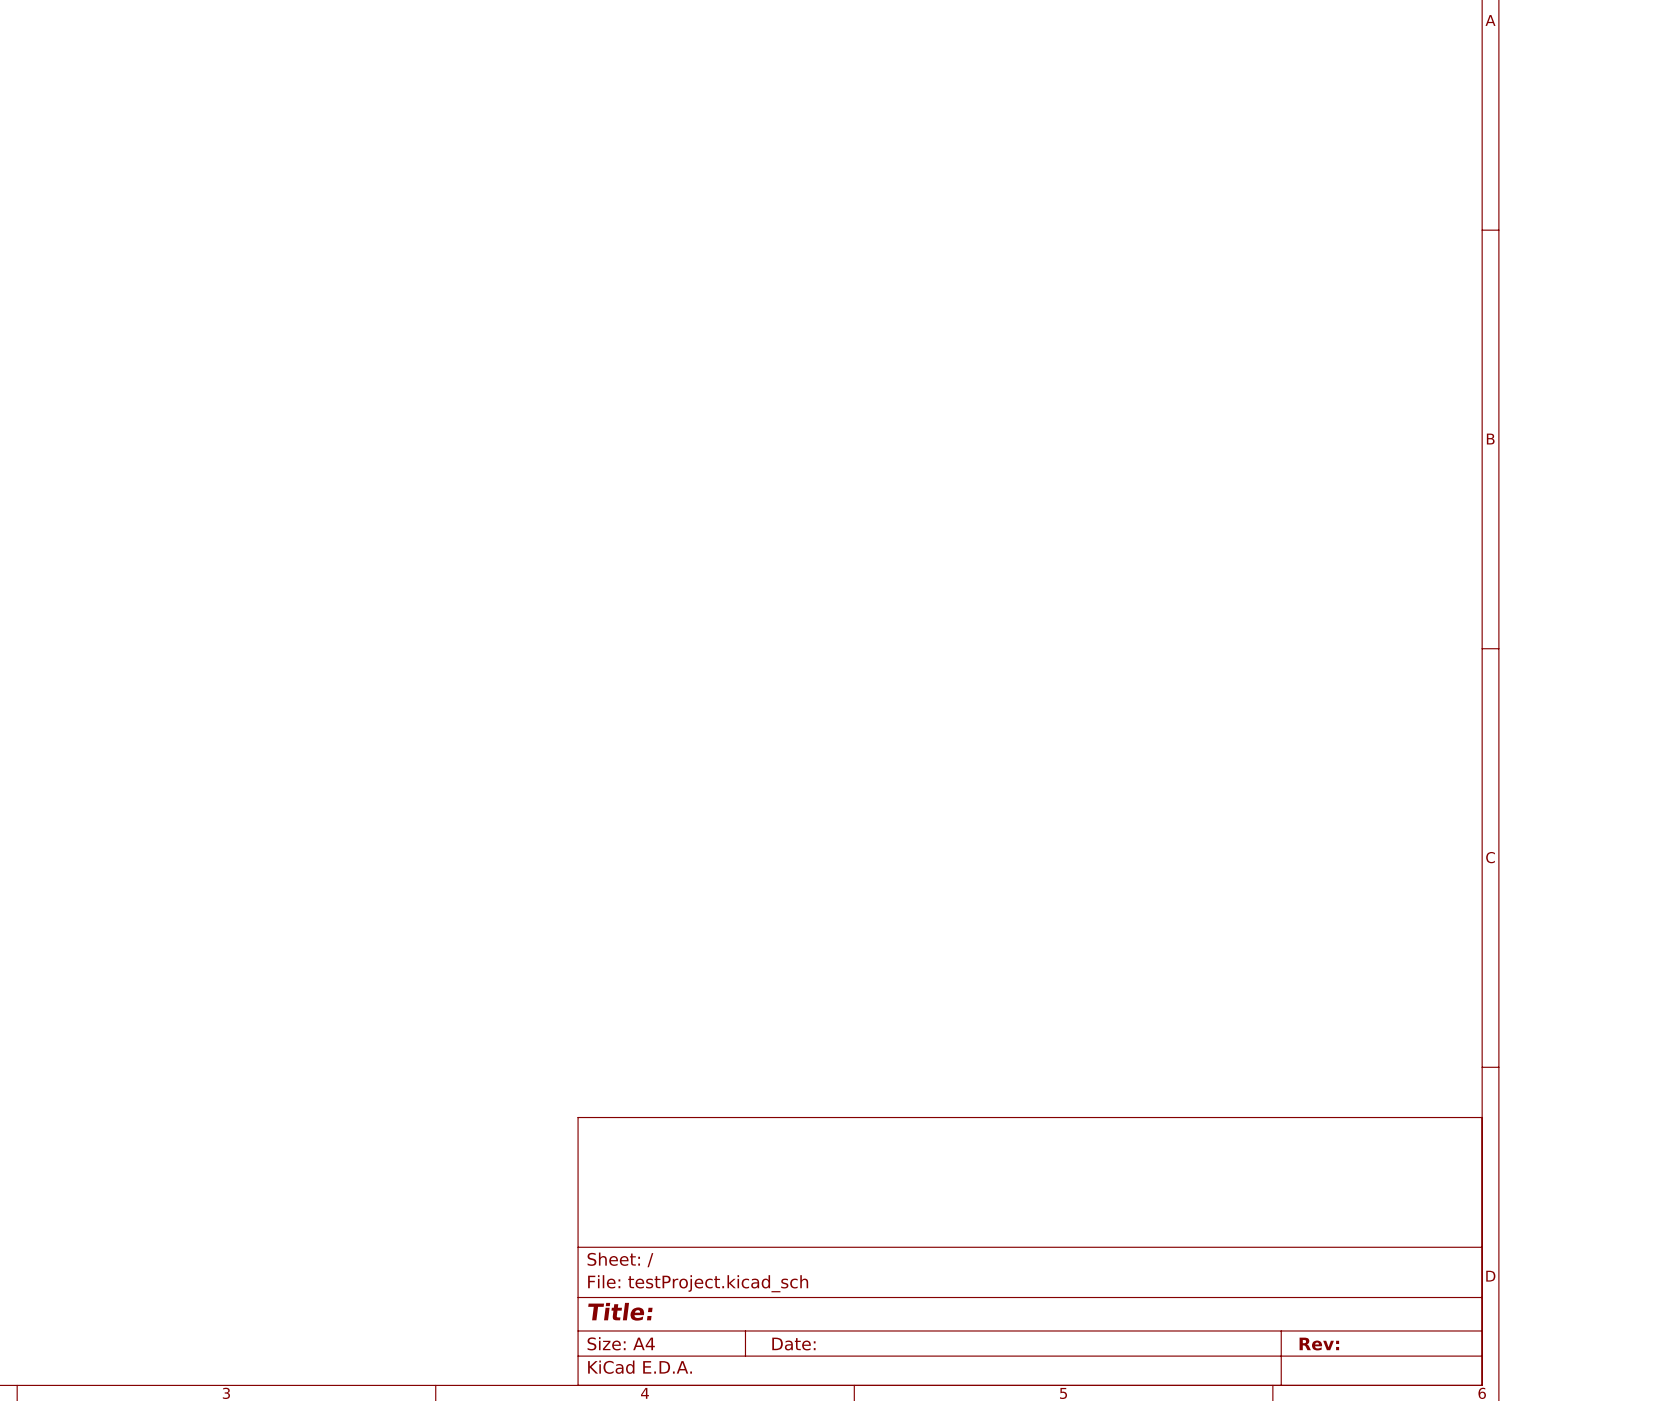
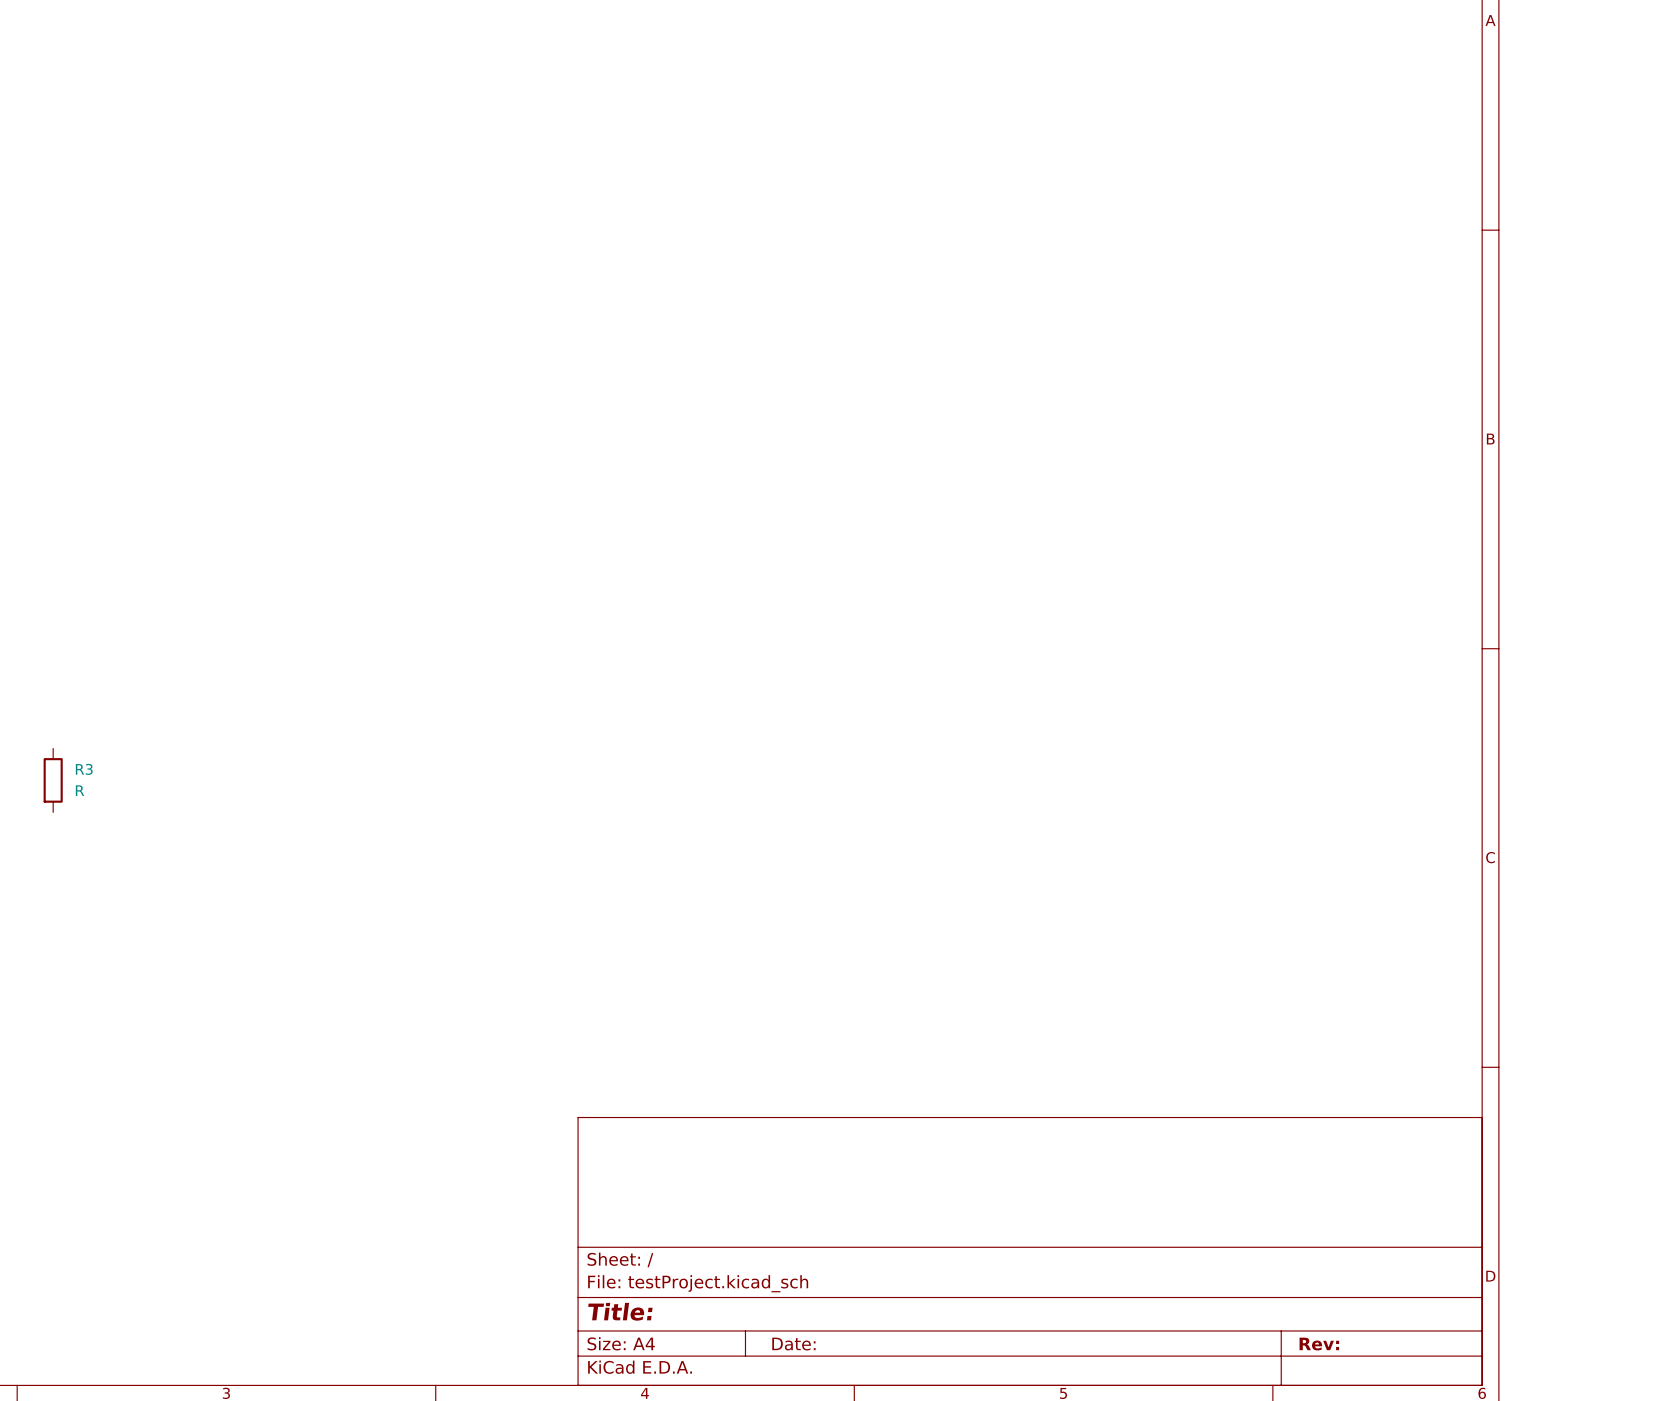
R3: none -> R (53, 780)

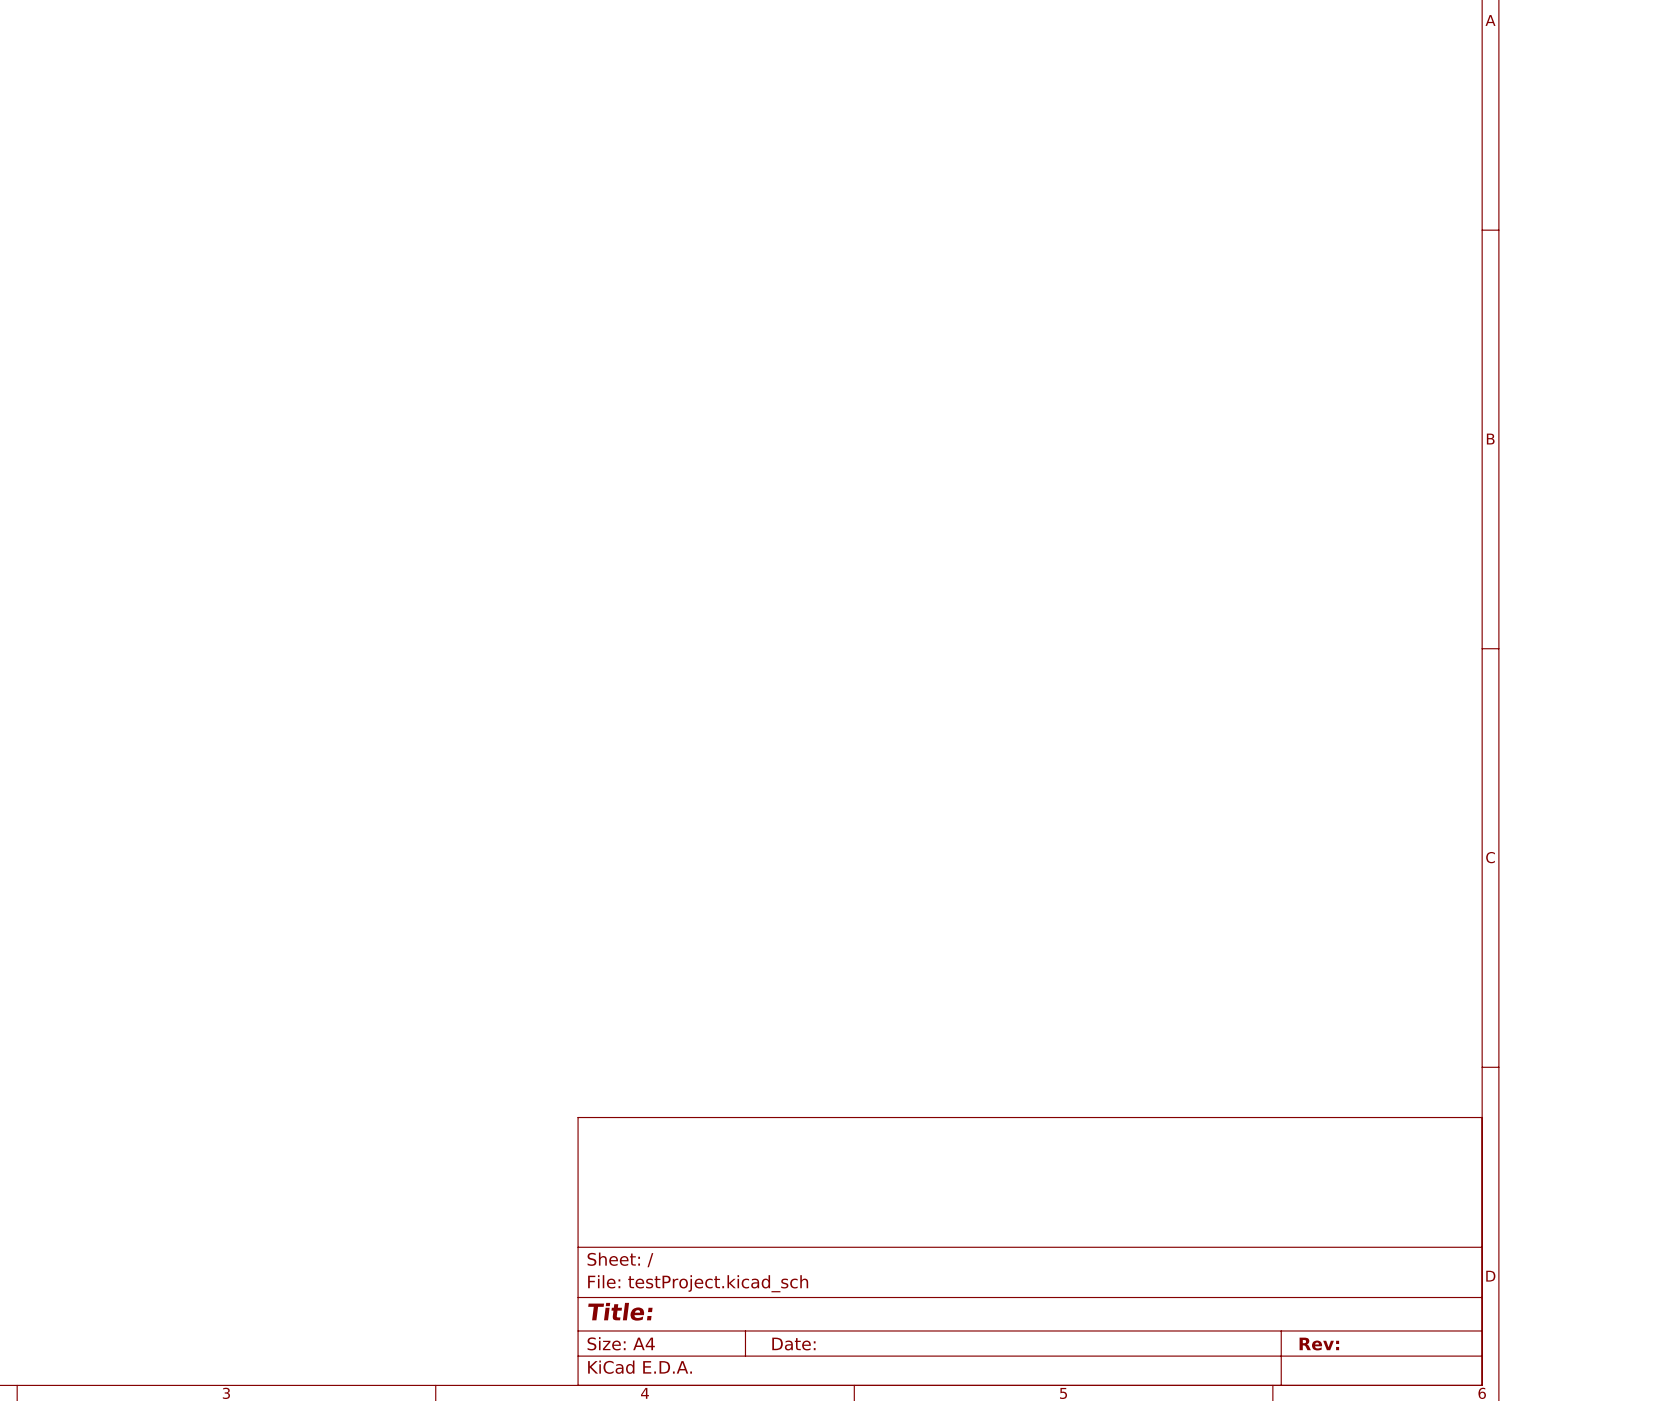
R3: R (53, 780) -> none

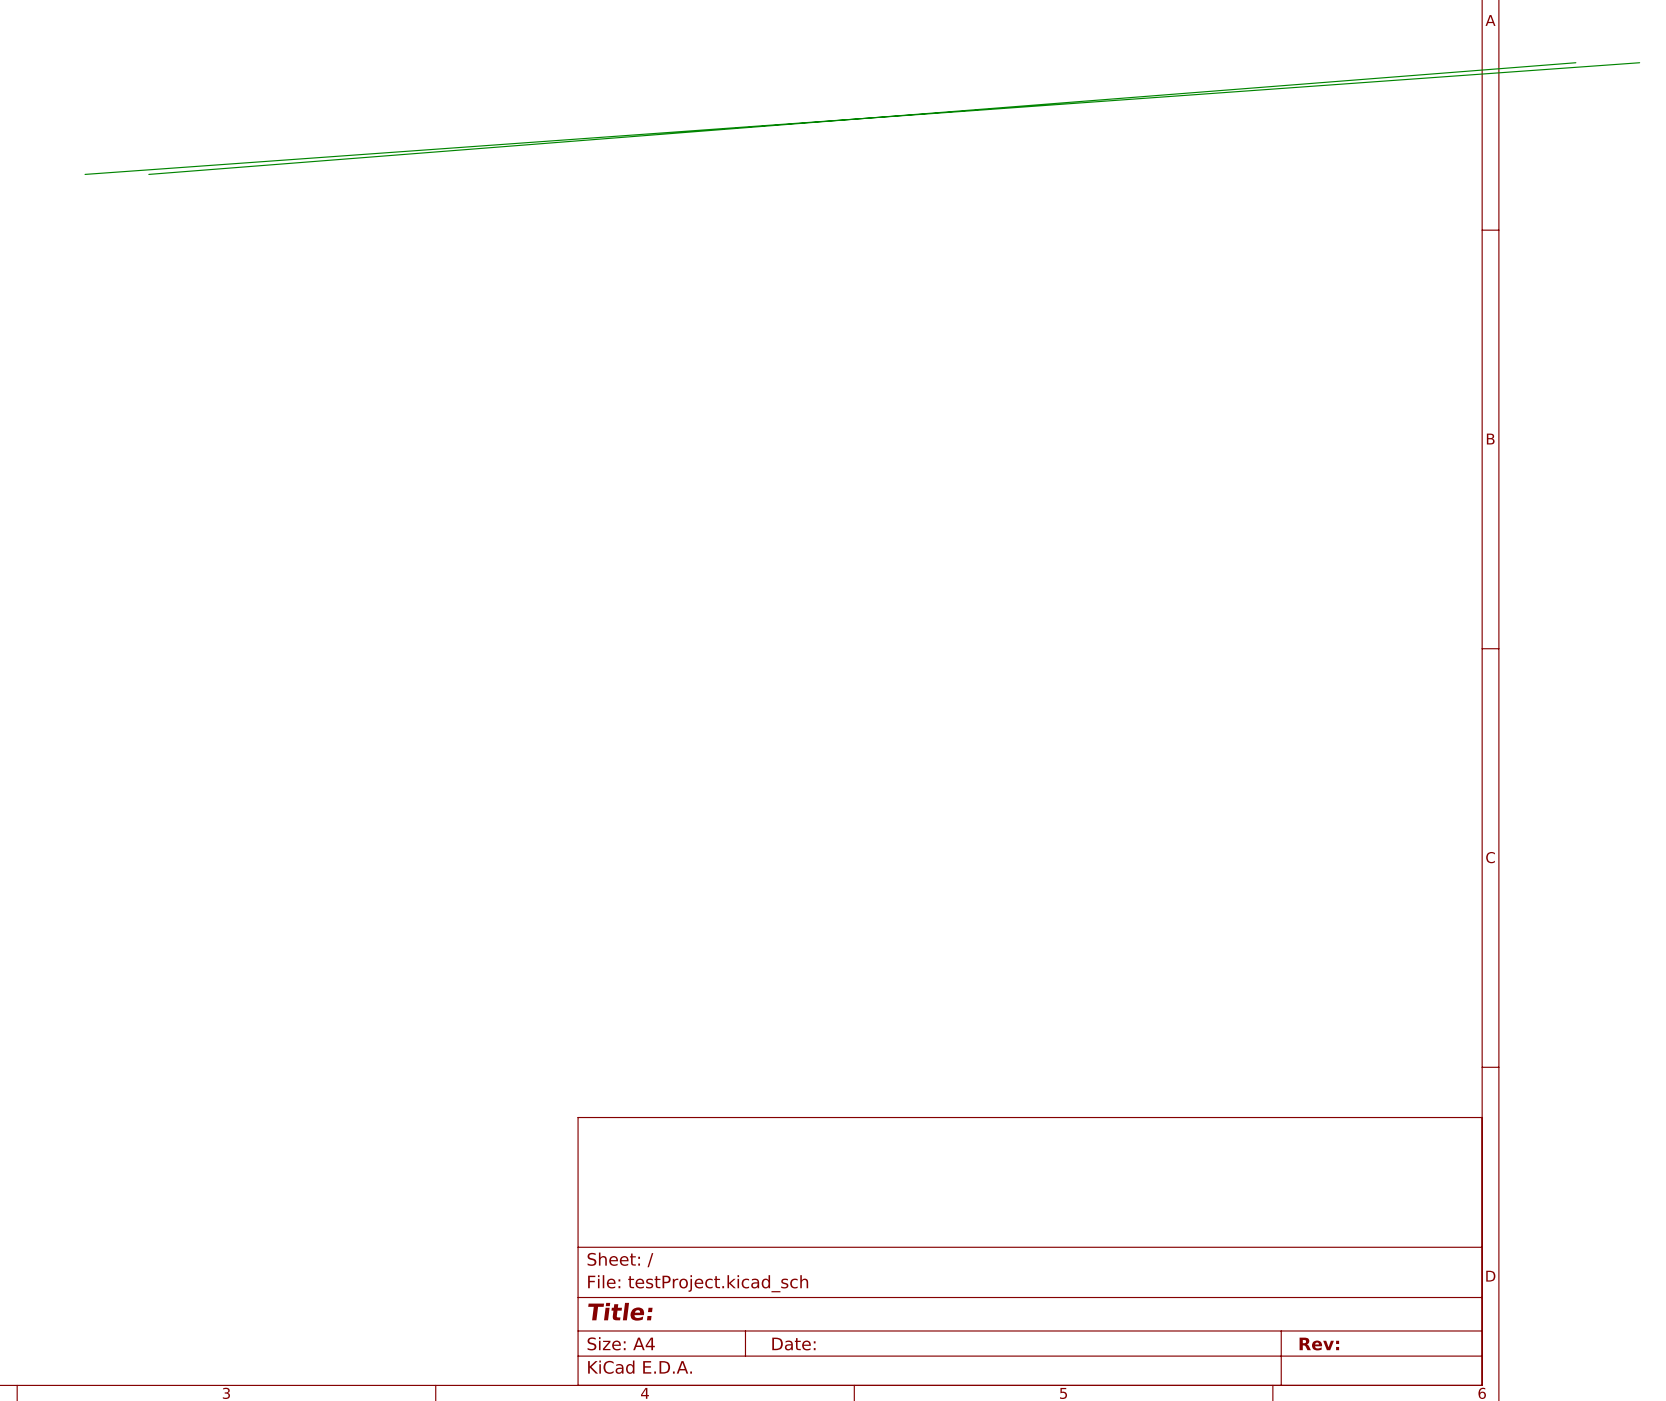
wire: none -> (1575, 62) (148, 174)
wire: none -> (1639, 62) (85, 174)

